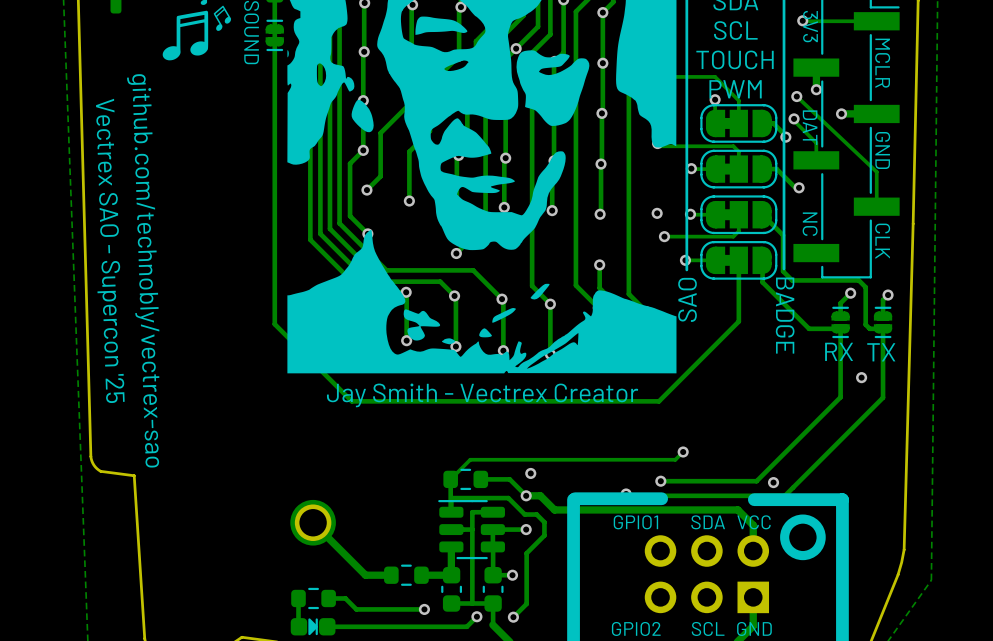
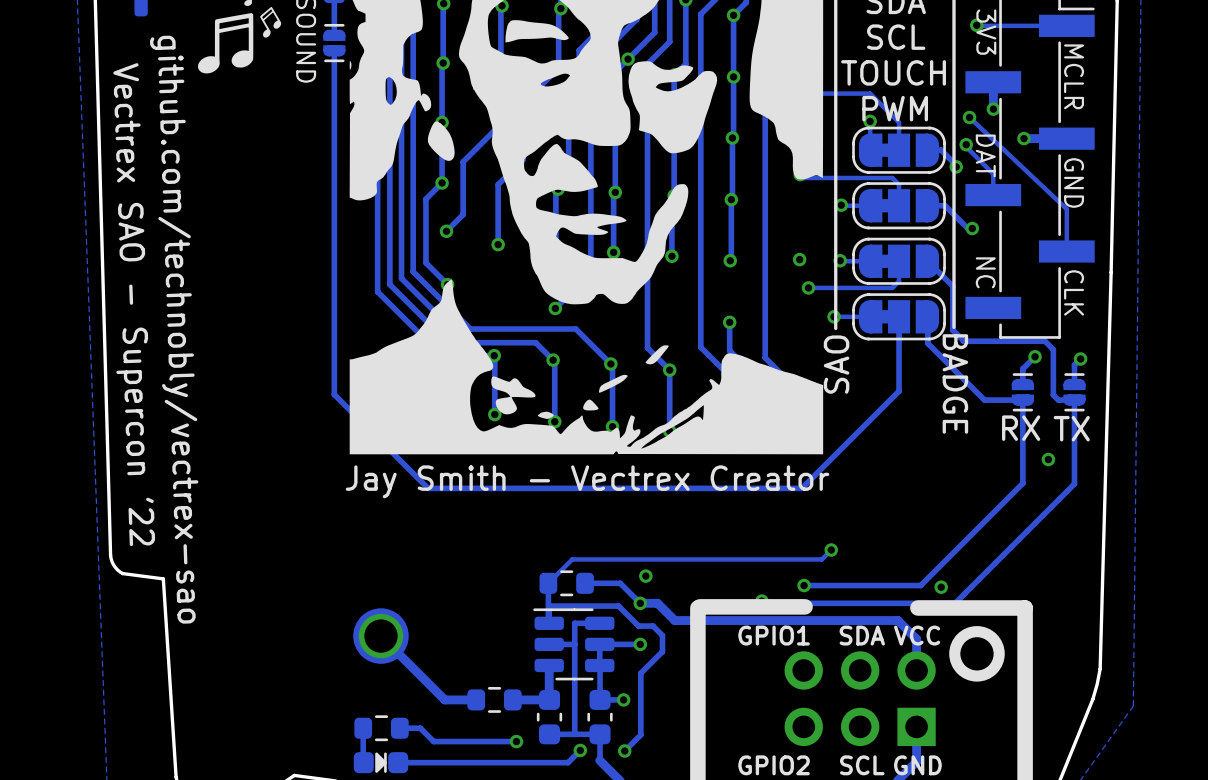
part footprint: [265, 19, 284, 52] -> [323, 23, 346, 63]
text: Vectrex SAO - Supercon '25 (110, 250) -> Vectrex SAO - Supercon '22 (134, 304)

